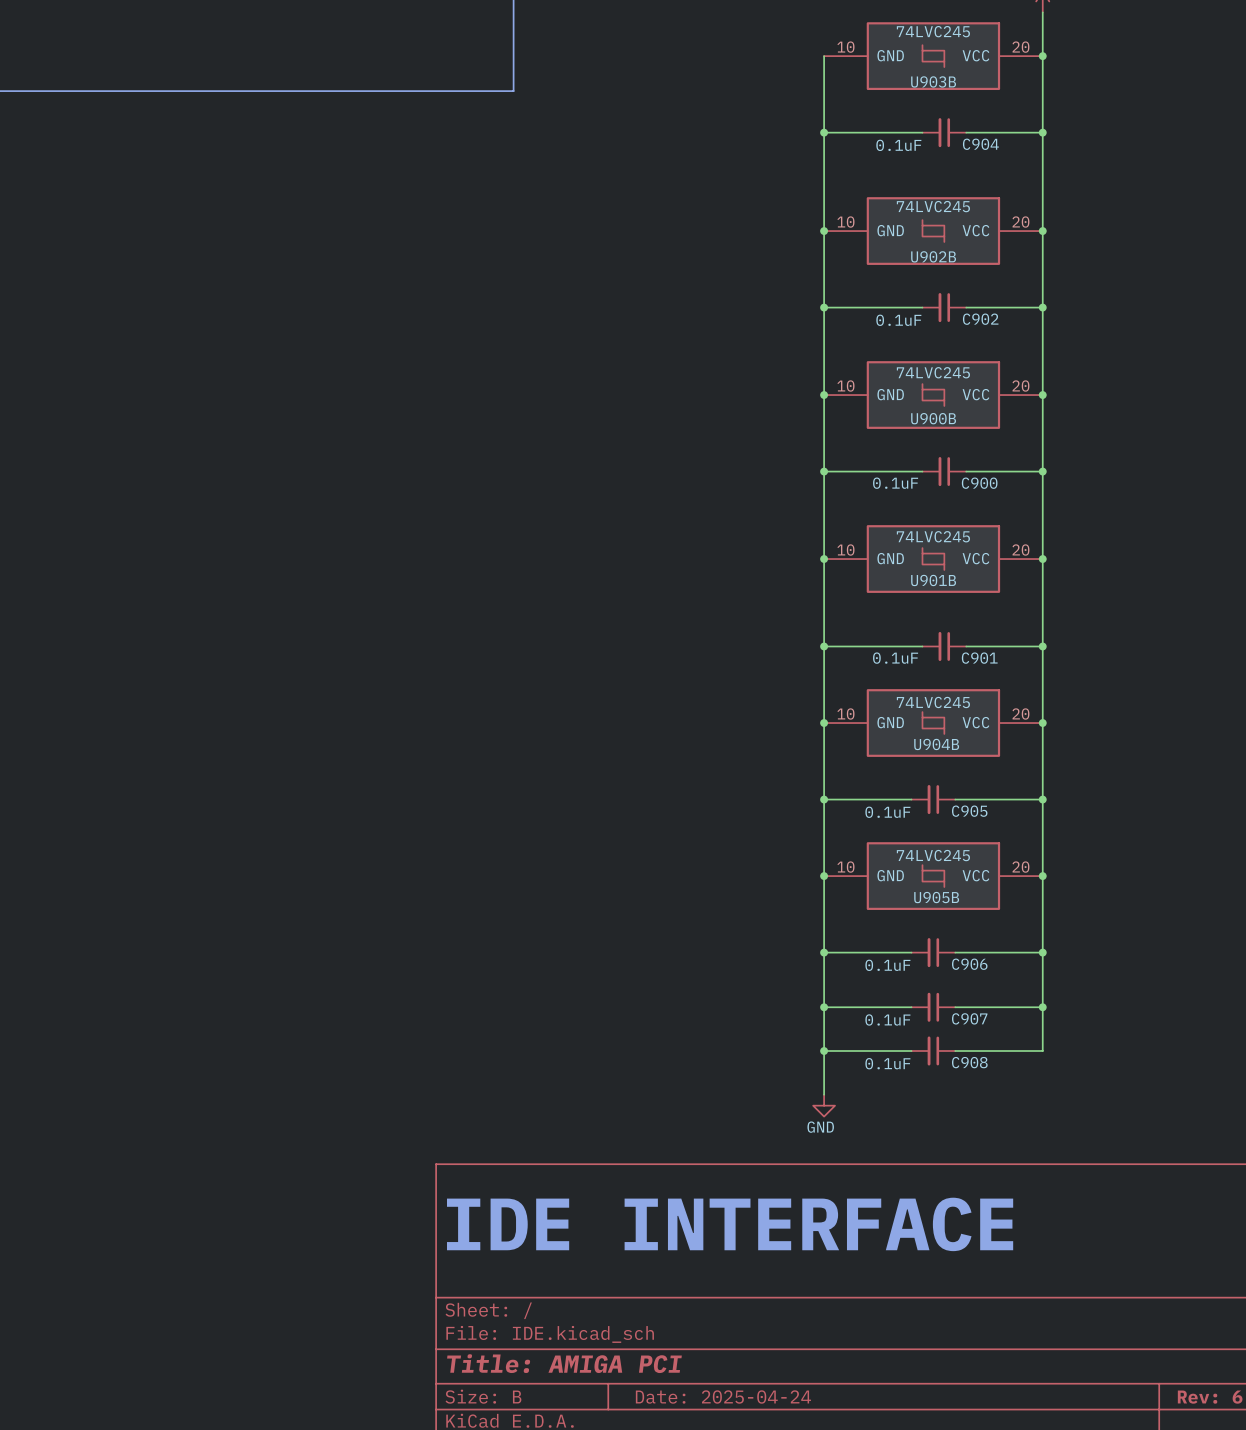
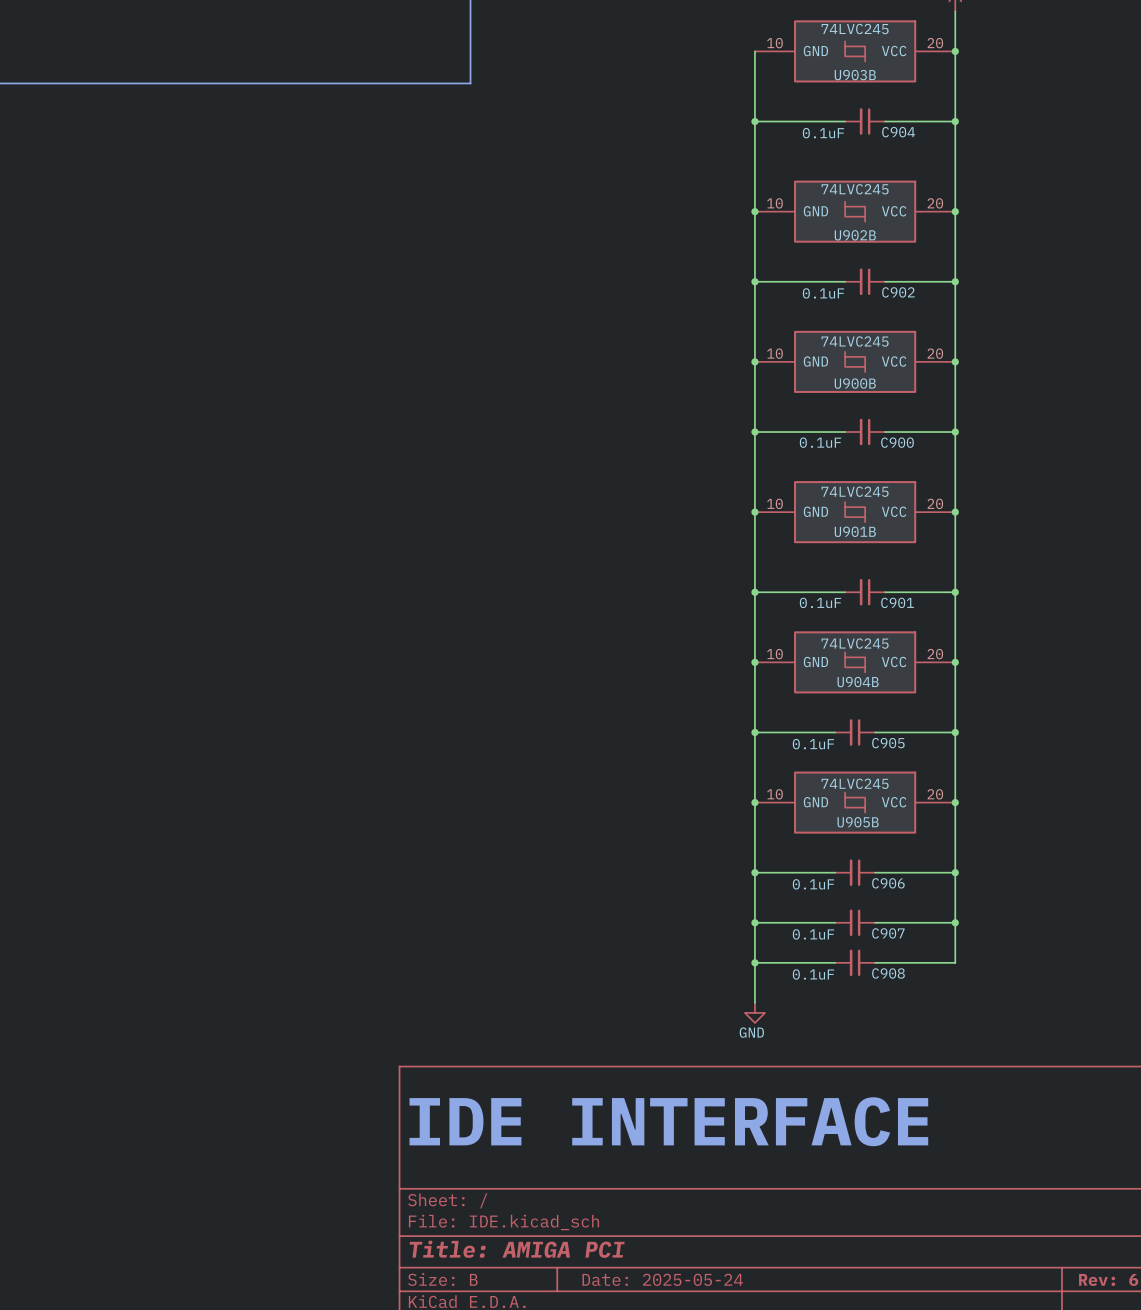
title block: Date: 2025-04-24 (723, 1397) -> Date: 2025-05-24 (662, 1279)

